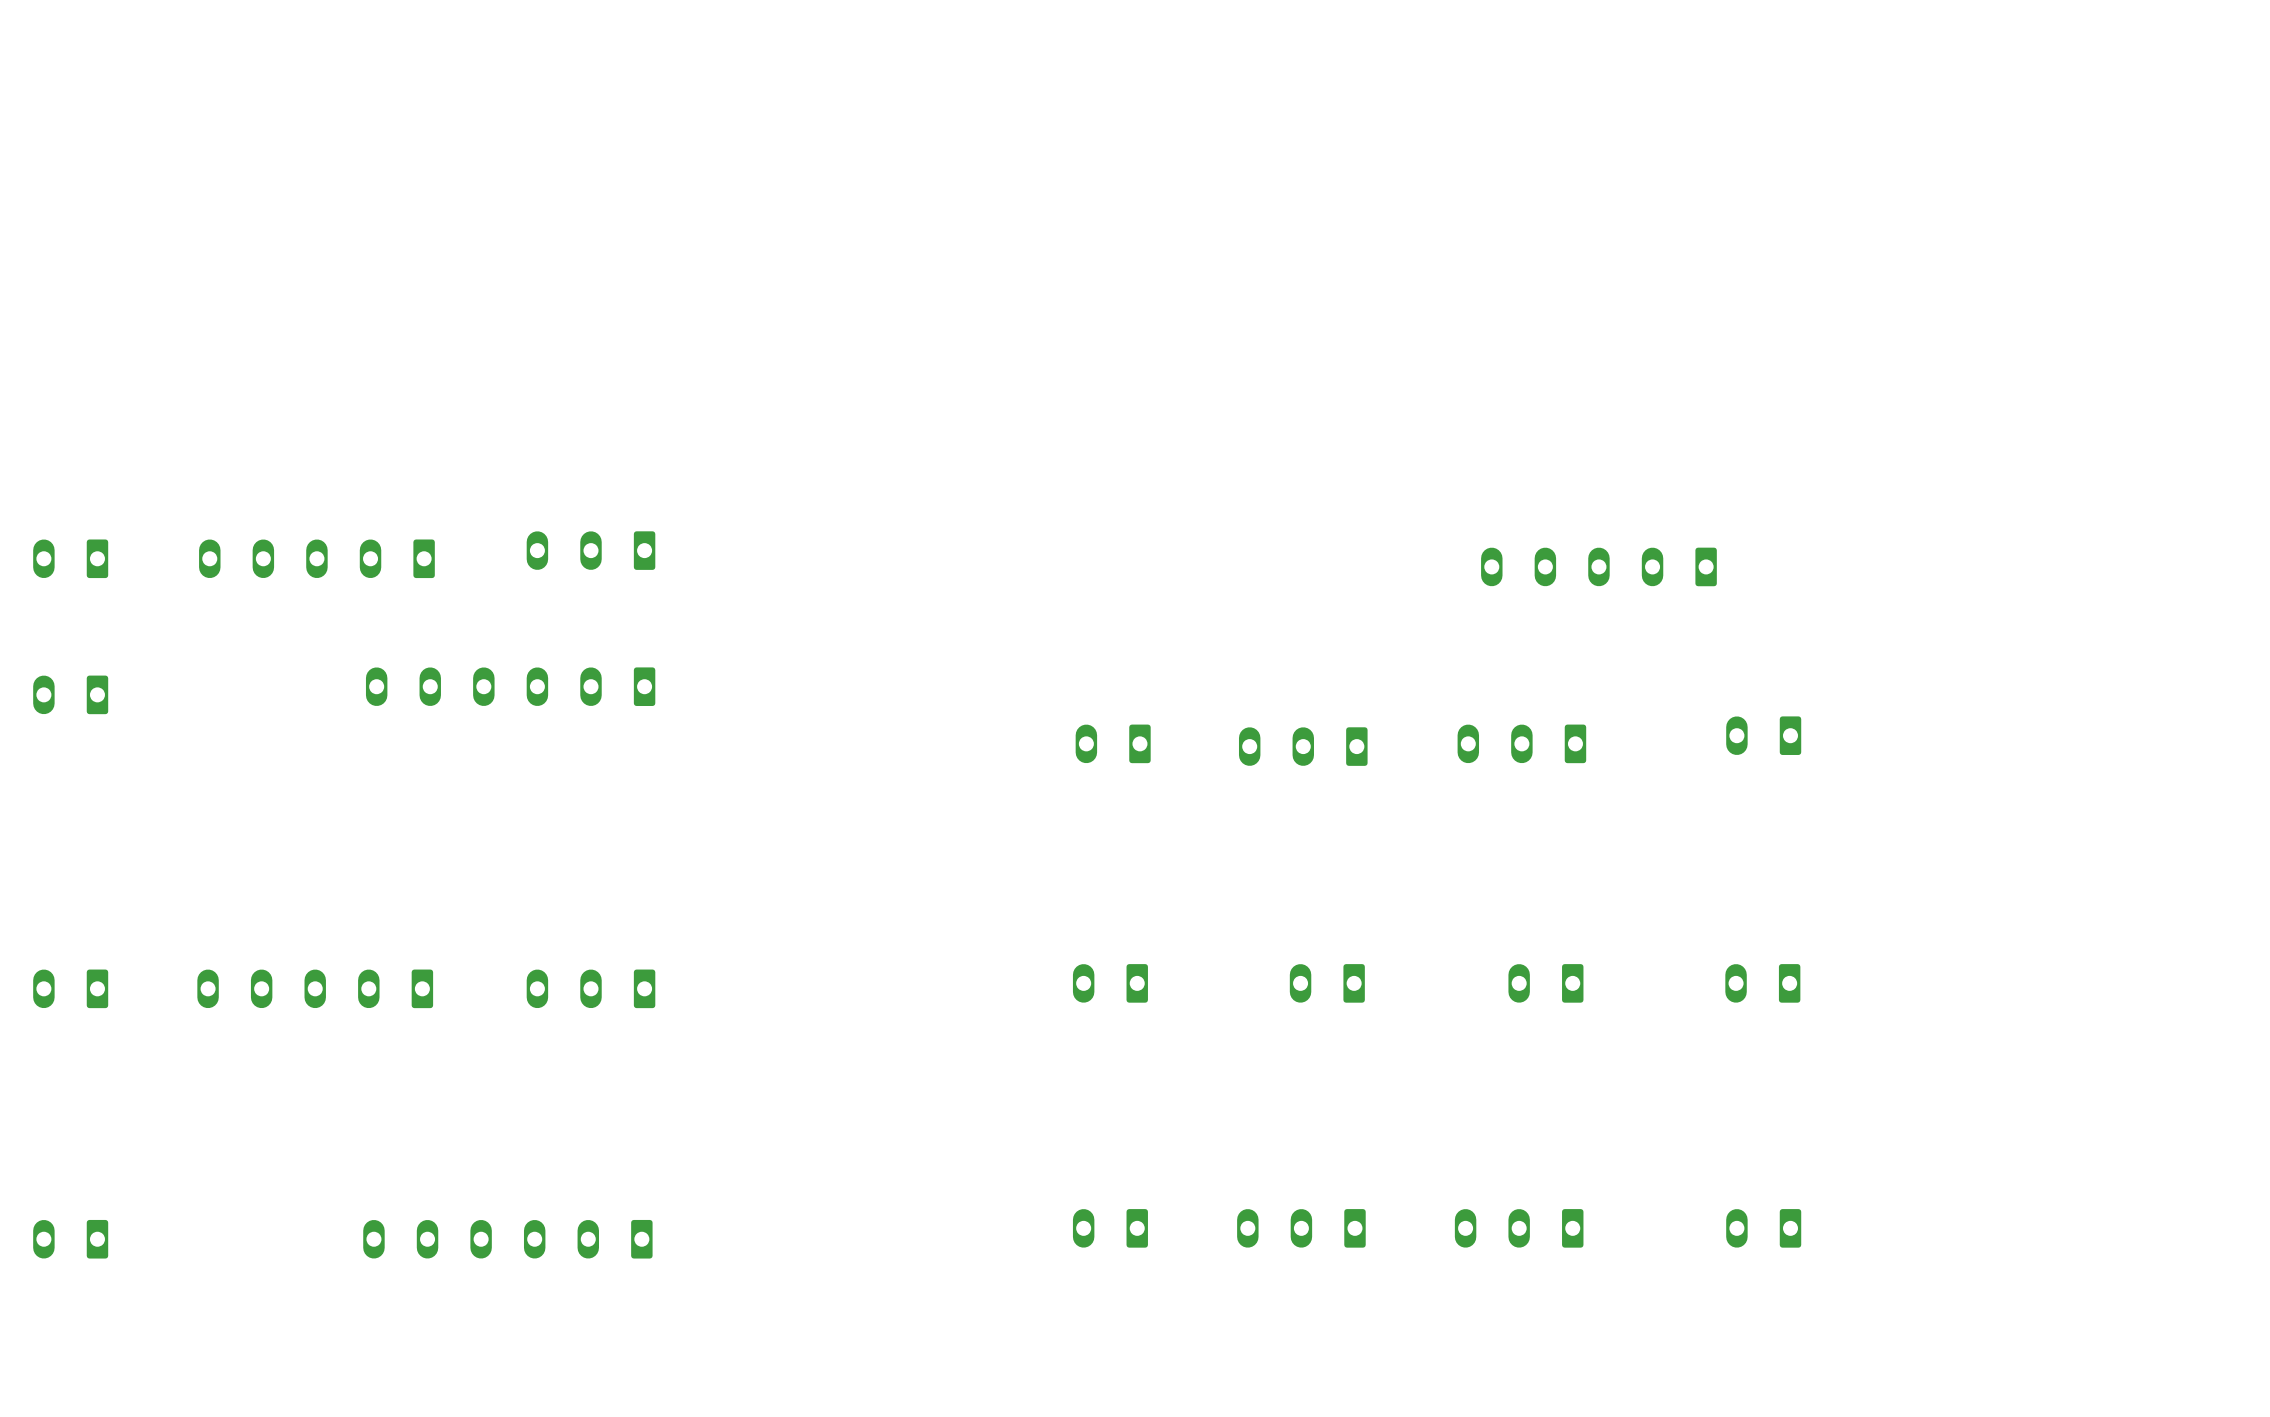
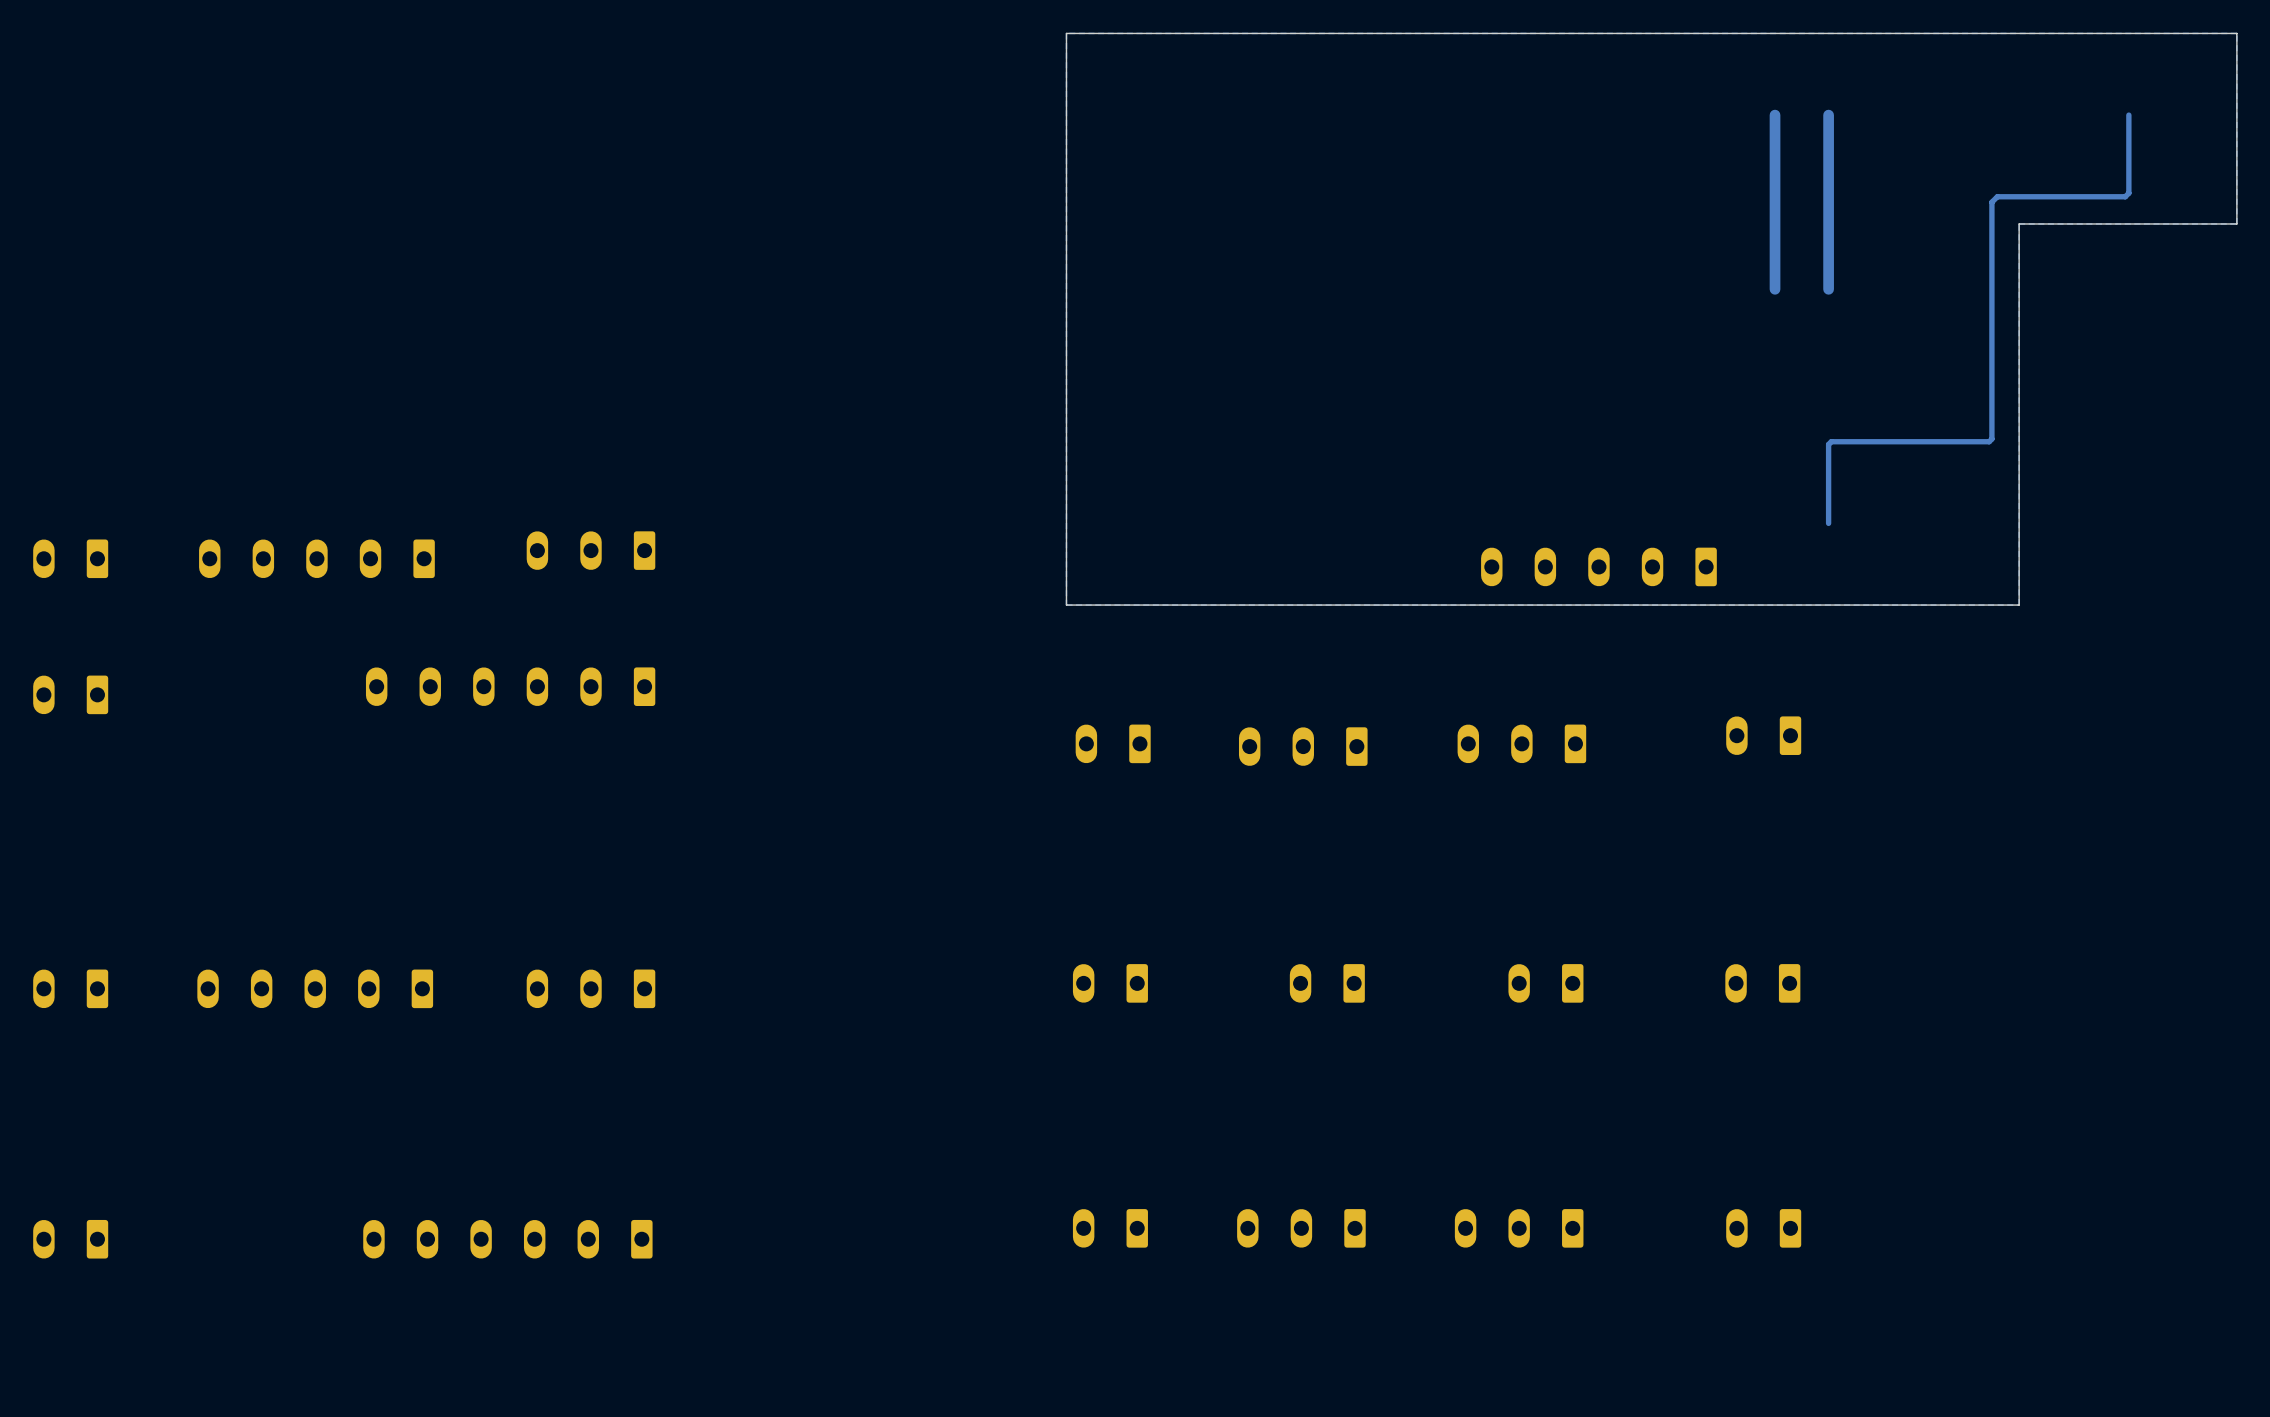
board edge: none -> (2236, 33) (1066, 33) (1066, 605) (2019, 605) (2019, 223) (2236, 223) (2236, 33)
bottom track: none -> (1775, 115) (1775, 289)
bottom track: none -> (1828, 115) (1828, 289)
bottom track: none -> (2128, 115) (2128, 193) (2125, 196) (1997, 196) (1991, 202) (1991, 439) (1989, 441) (1831, 441) (1828, 444) (1828, 523)

